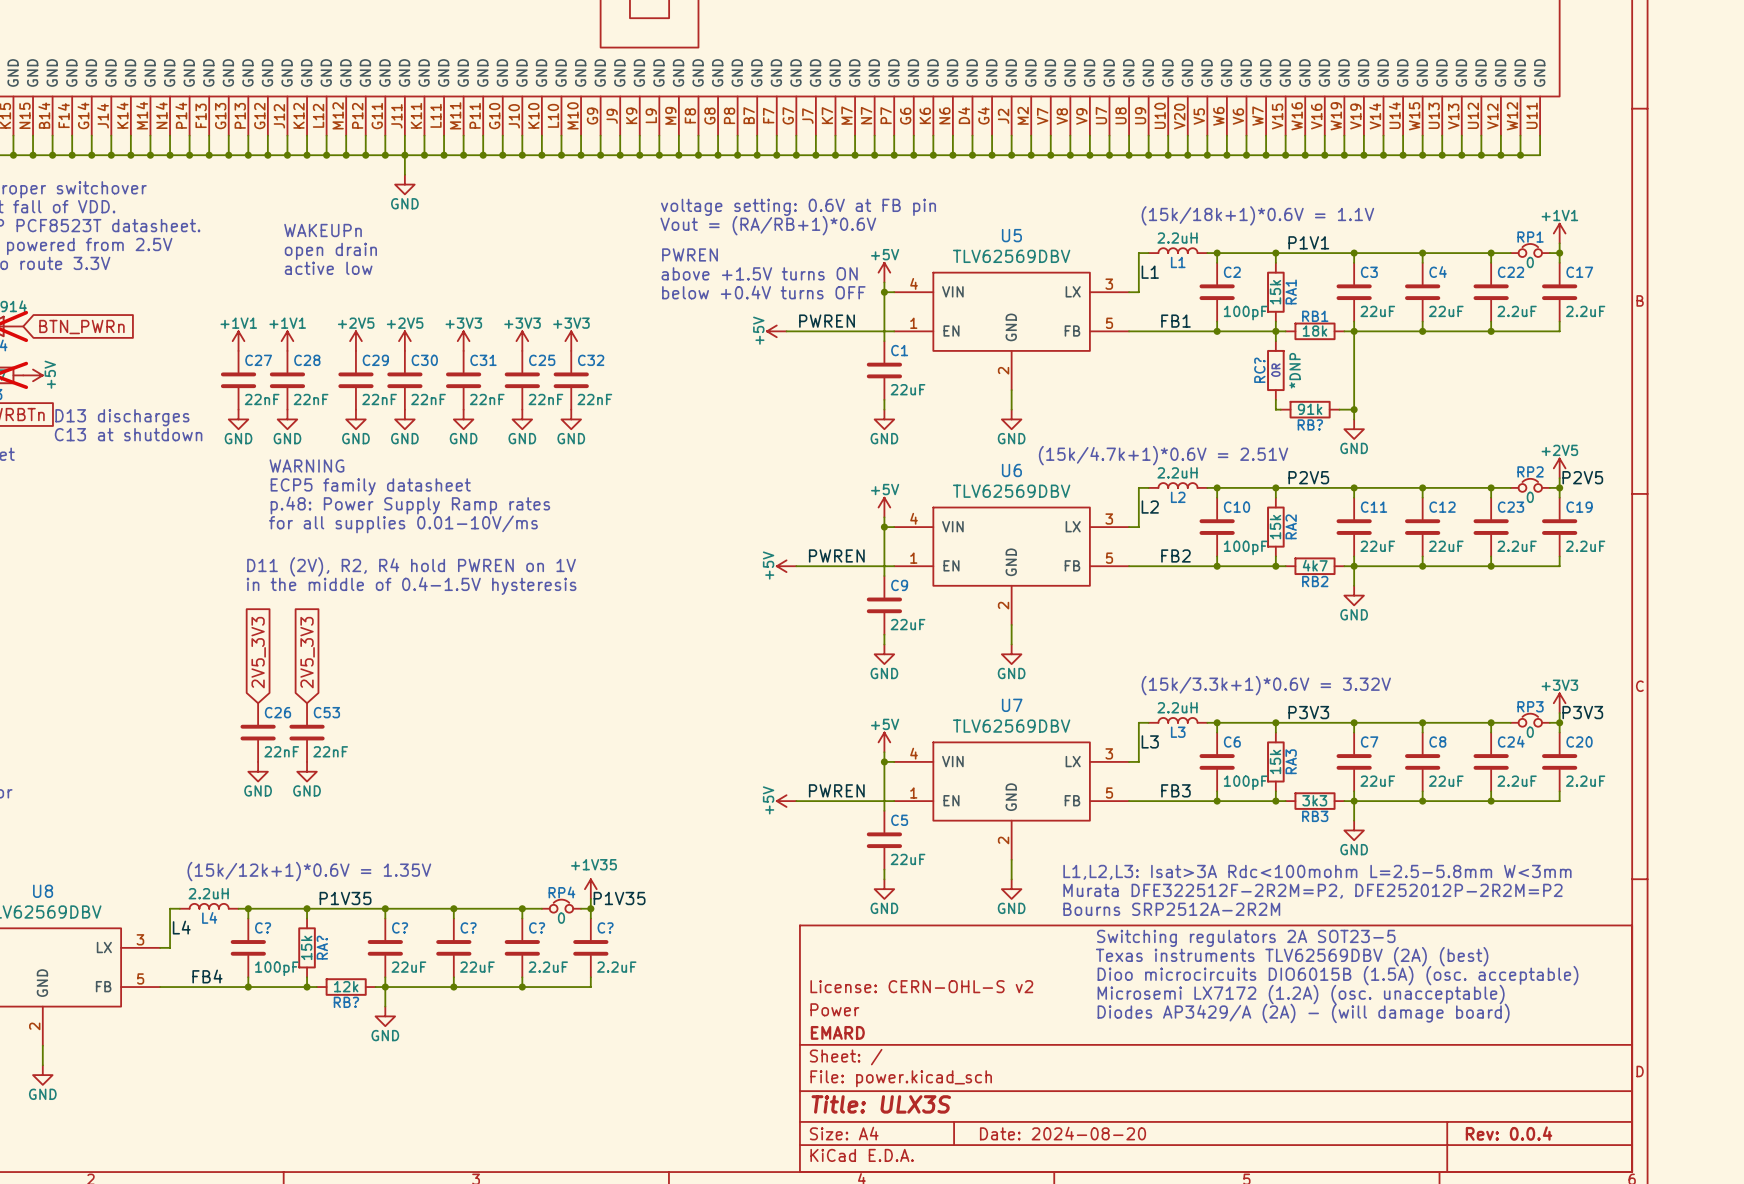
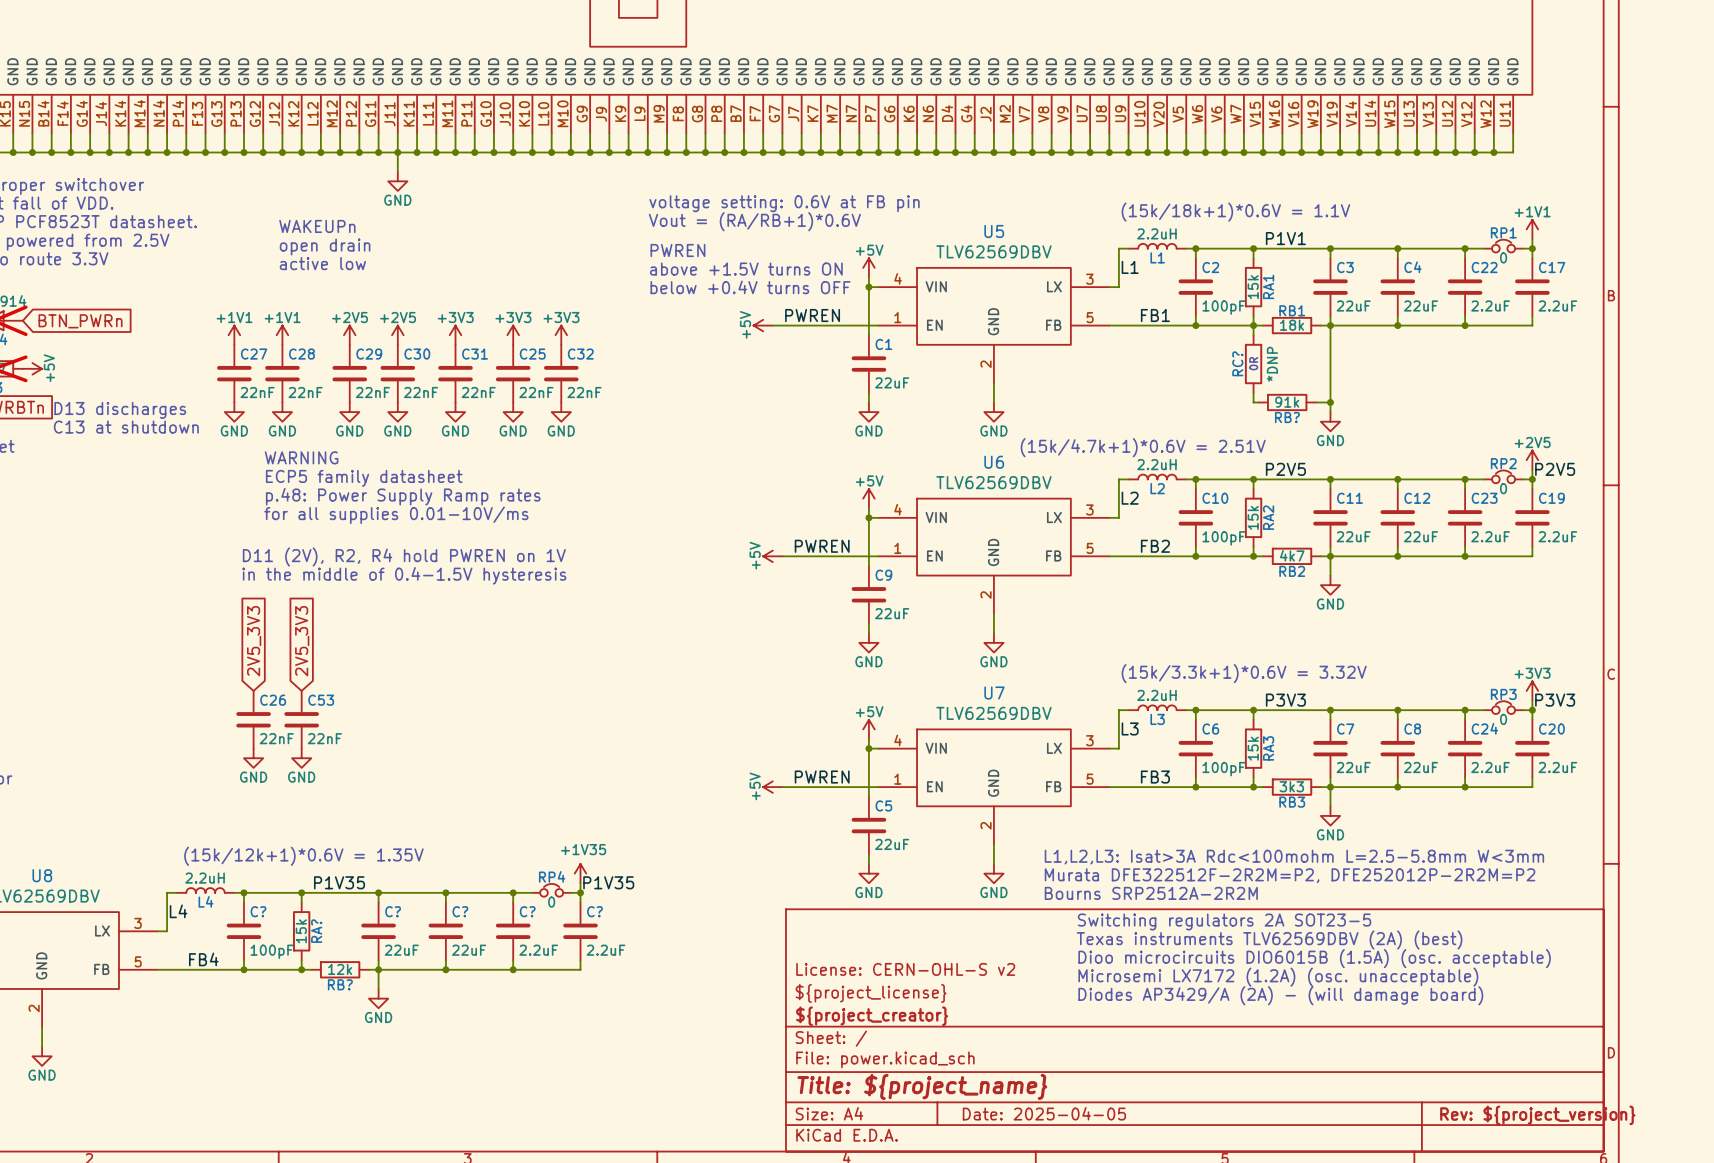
title block: Power (834, 1009) -> ${project_license} (871, 993)
title block: EMARD (837, 1032) -> ${project_creator} (872, 1016)
title block: Title: ULX3S (881, 1104) -> Title: ${project_name} (922, 1086)
title block: Date: 2024-08-20 (1062, 1133) -> Date: 2025-04-05 (1044, 1113)
title block: Rev: 0.0.4 (1509, 1133) -> Rev: ${project_version} (1537, 1115)

